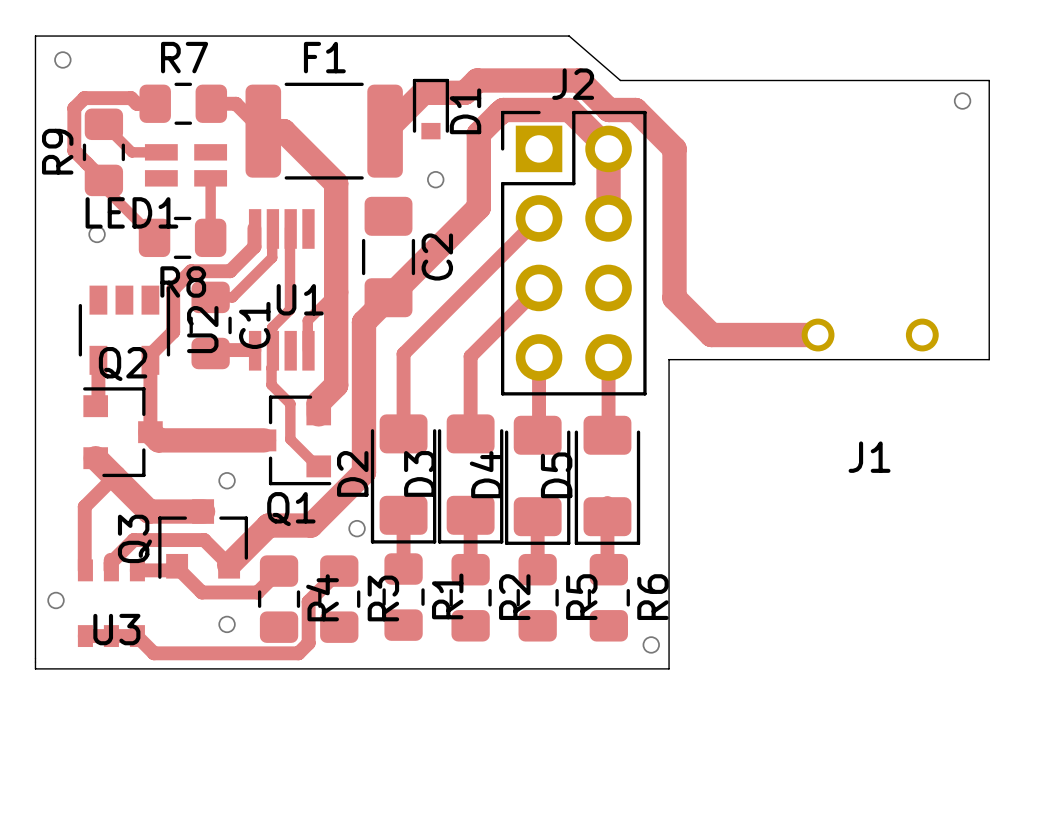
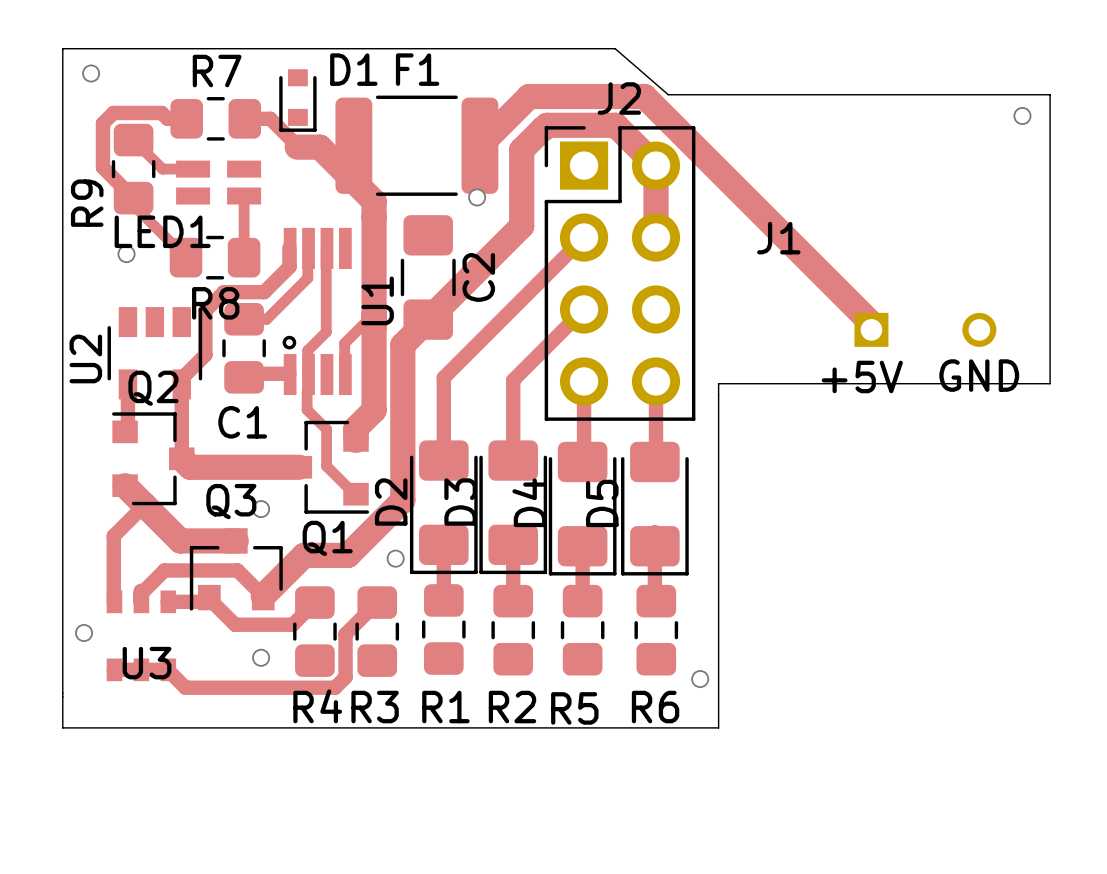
D1 rotation: 0° (430, 109) -> 180° (297, 100)
D1 position: (430, 109) -> (297, 100)
track: none -> (479, 145) (529, 96) (644, 96) (871, 323) (871, 329)
F1 position: (324, 131) -> (416, 145)
track: (385, 131) (423, 92) (464, 92) (477, 80) (579, 80) (608, 110) (635, 110) (674, 148) (674, 298) (711, 335) (818, 335) -> none
R9 name position: R9 (57, 151) -> R9 (87, 203)
U1 footprint: [248, 209, 315, 371] -> [282, 227, 352, 396]
J1 footprint: [801, 318, 939, 352] -> [854, 312, 997, 347]
C1 name rotation: 0° (254, 325) -> 90° clockwise (242, 422)
C1 name position: C1 (254, 325) -> C1 (242, 422)
U2 name position: U2 (202, 329) -> U2 (85, 358)
text: none -> GND (979, 375)
text: none -> +5V (862, 376)
J1 name position: J1 (869, 457) -> J1 (778, 238)
Q3 name rotation: 0° (134, 538) -> 90° clockwise (231, 501)
Q3 name position: Q3 (134, 538) -> Q3 (231, 501)
R1 name rotation: 0° (447, 596) -> 90° clockwise (445, 707)
R1 name position: R1 (447, 596) -> R1 (445, 707)
R4 name rotation: 0° (322, 597) -> 90° clockwise (317, 706)
R4 name position: R4 (322, 597) -> R4 (317, 706)
R2 name rotation: 0° (514, 597) -> 90° clockwise (512, 707)
R2 name position: R2 (514, 597) -> R2 (512, 707)
R5 name rotation: 0° (581, 597) -> 90° clockwise (574, 708)
R5 name position: R5 (581, 597) -> R5 (574, 708)
R6 name rotation: 0° (652, 597) -> 90° clockwise (655, 707)
R6 name position: R6 (652, 597) -> R6 (655, 707)
R3 name rotation: 0° (383, 598) -> 90° clockwise (375, 707)
R3 name position: R3 (383, 598) -> R3 (375, 707)
board edge: (35, 668) (669, 668) -> (62, 703) (62, 727) (718, 727) (718, 703)

